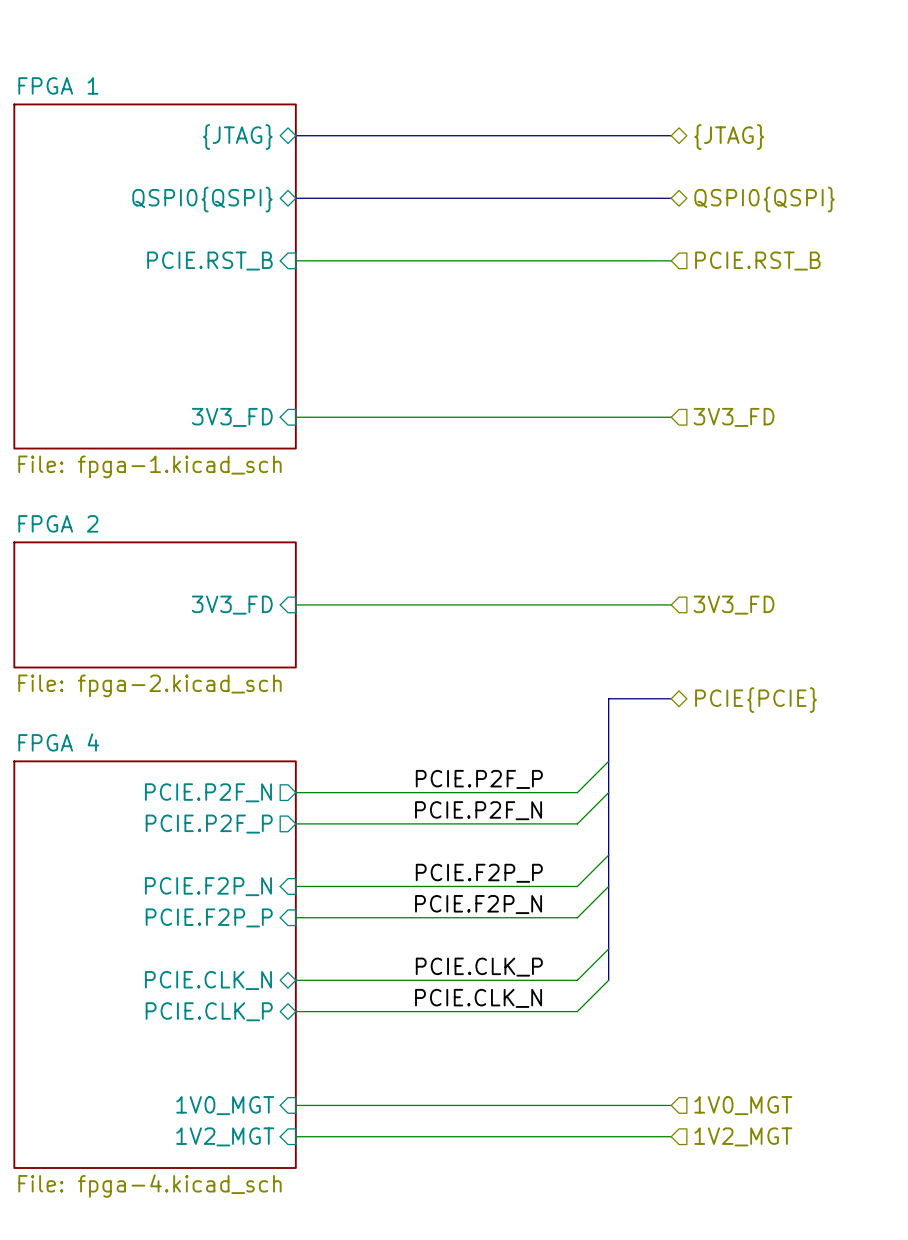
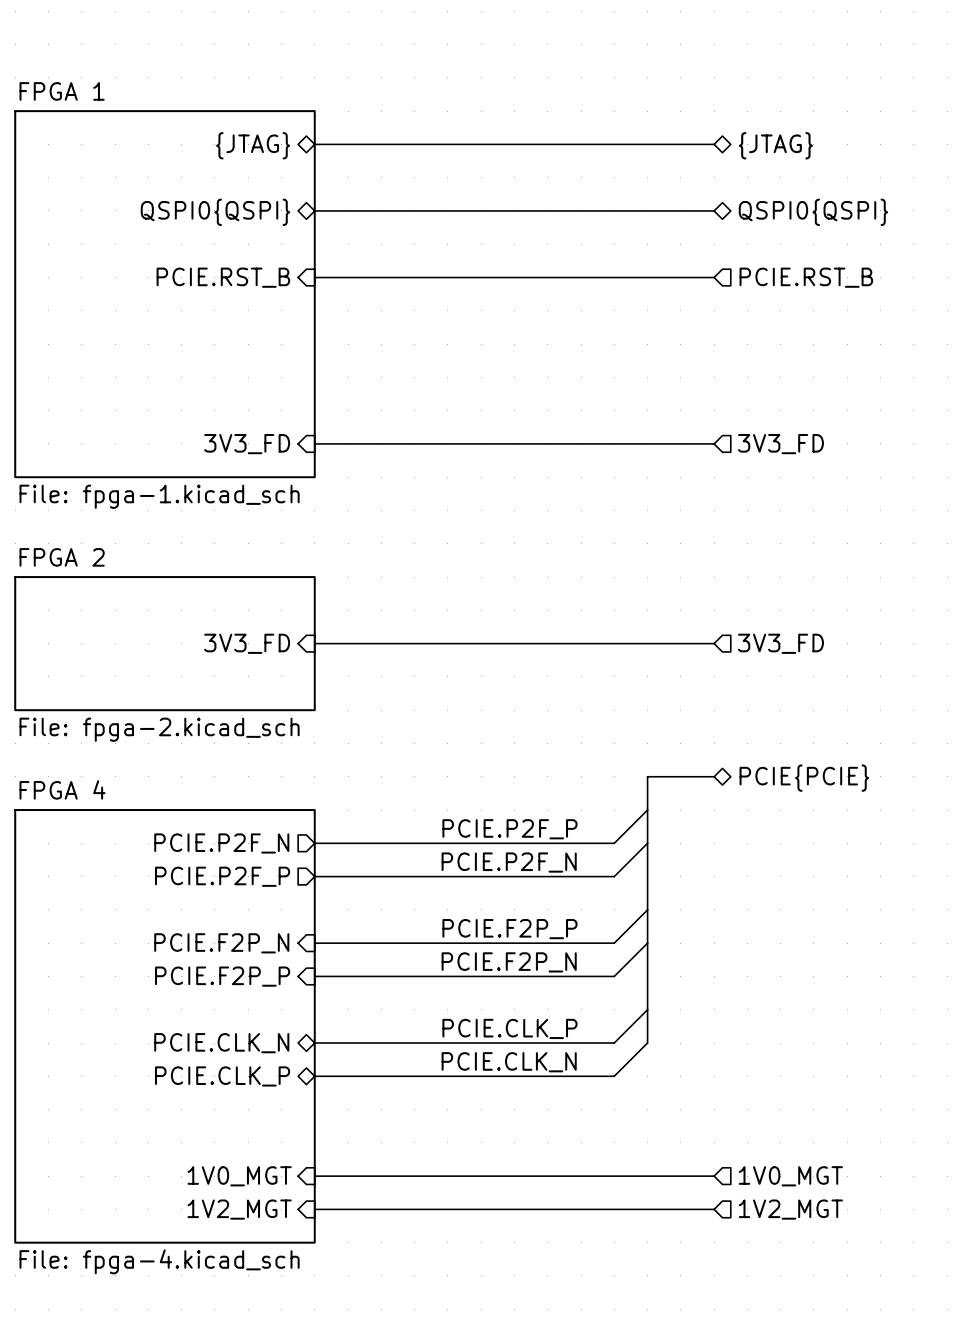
bus: (671, 698) (608, 698) (608, 730) -> (714, 776) (647, 776)
hierarchical label position: PCIE{PCIE} (755, 700) -> PCIE{PCIE} (804, 778)

